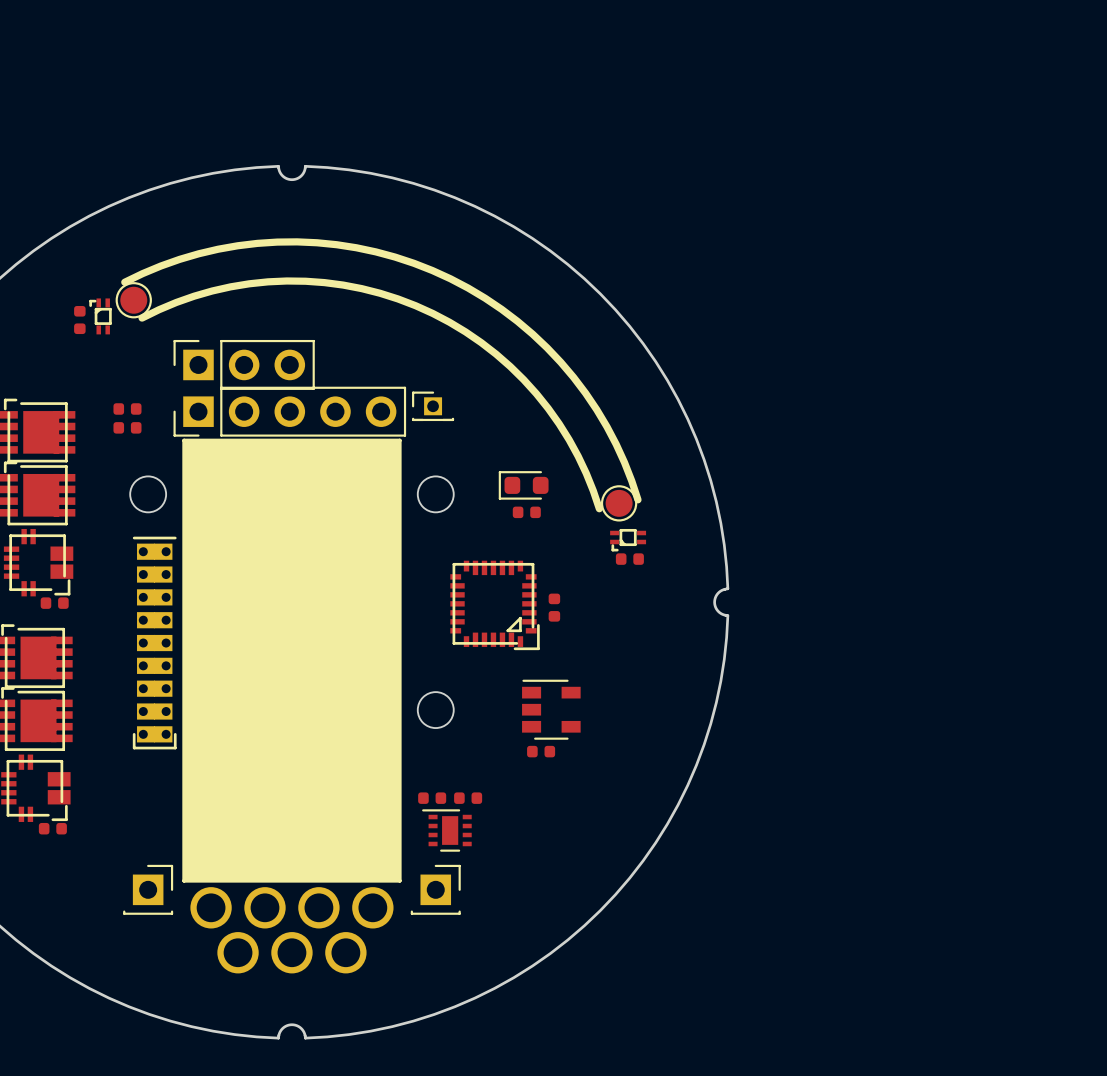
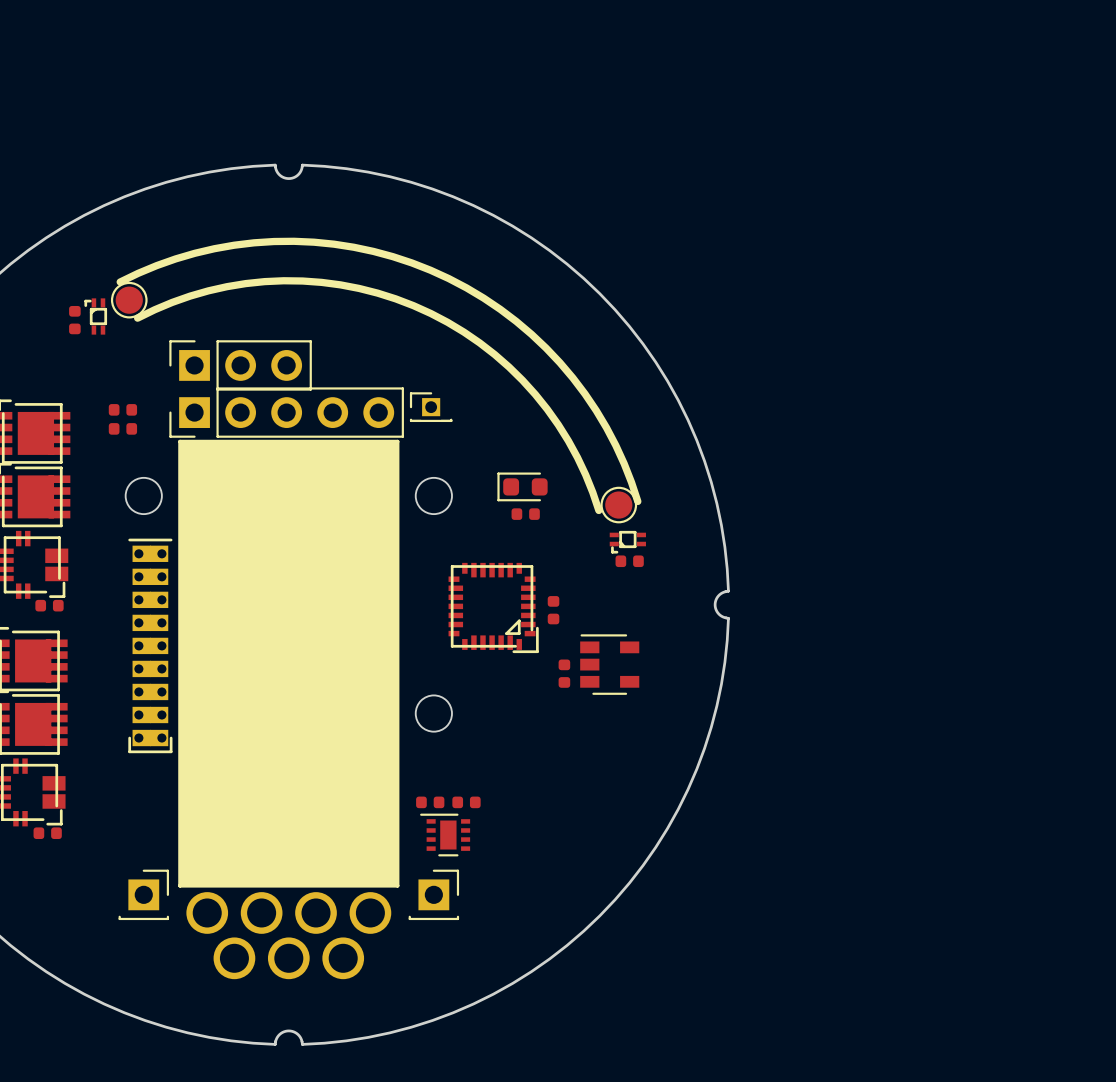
part position: (551, 709) -> (609, 664)
part rotation: 0° (541, 751) -> 90° clockwise (564, 673)
part position: (541, 751) -> (564, 673)

